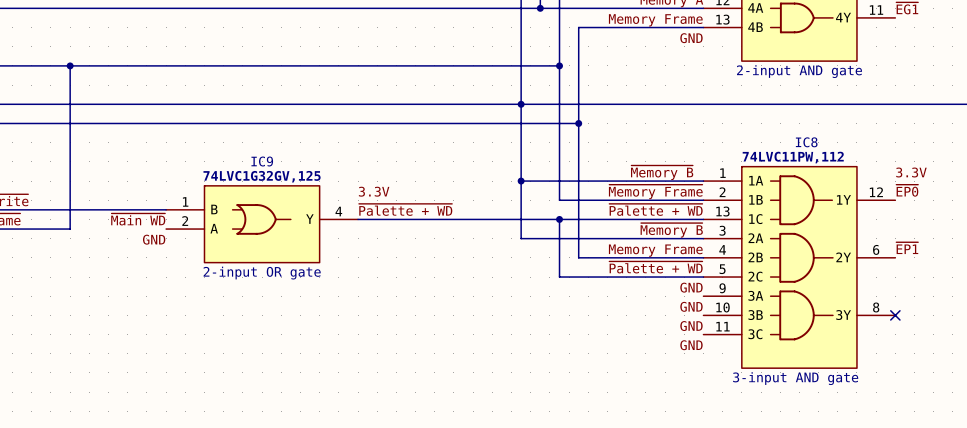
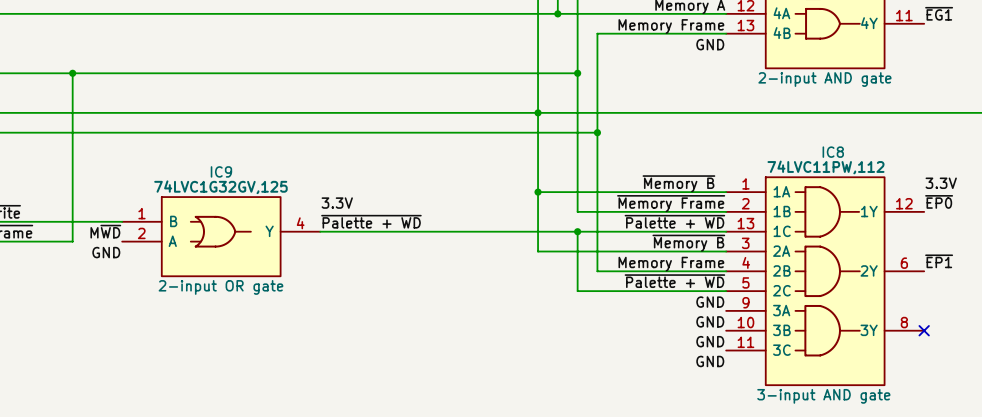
label position: 3.3V (374, 191) -> 3.3V (337, 203)
label position: ~{Palette + WD} (405, 209) -> ~{Palette + WD} (371, 221)
label: ~{Main WD} (138, 219) -> M~{WD} (105, 231)
IC9 position: (262, 224) -> (221, 236)
label position: GND (154, 239) -> GND (106, 252)

